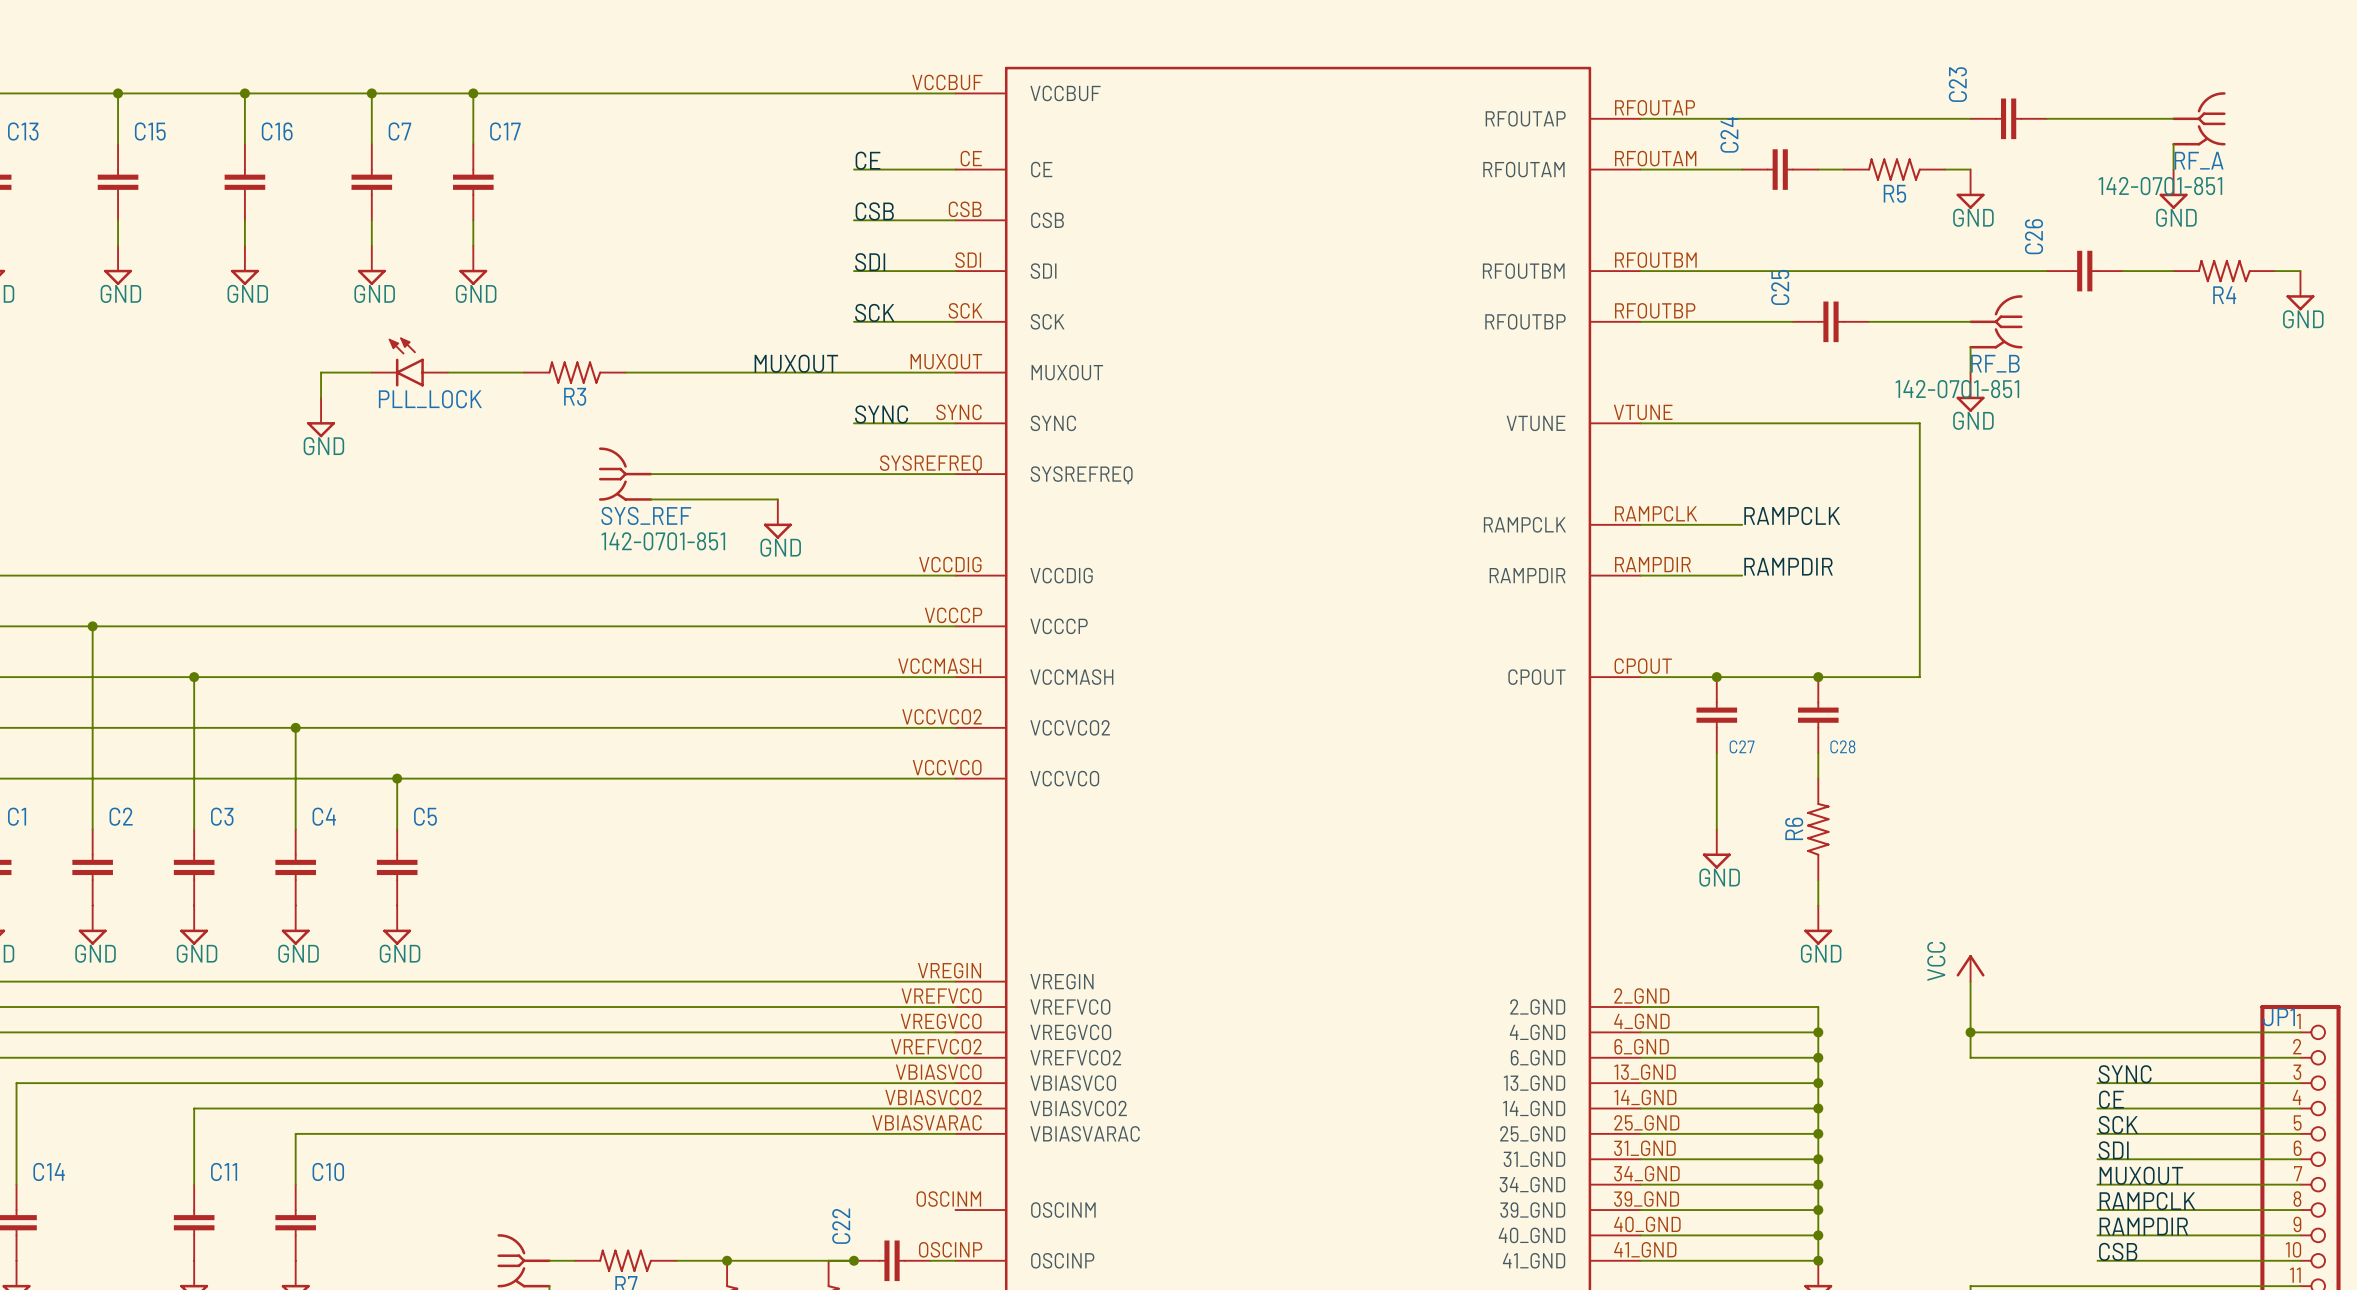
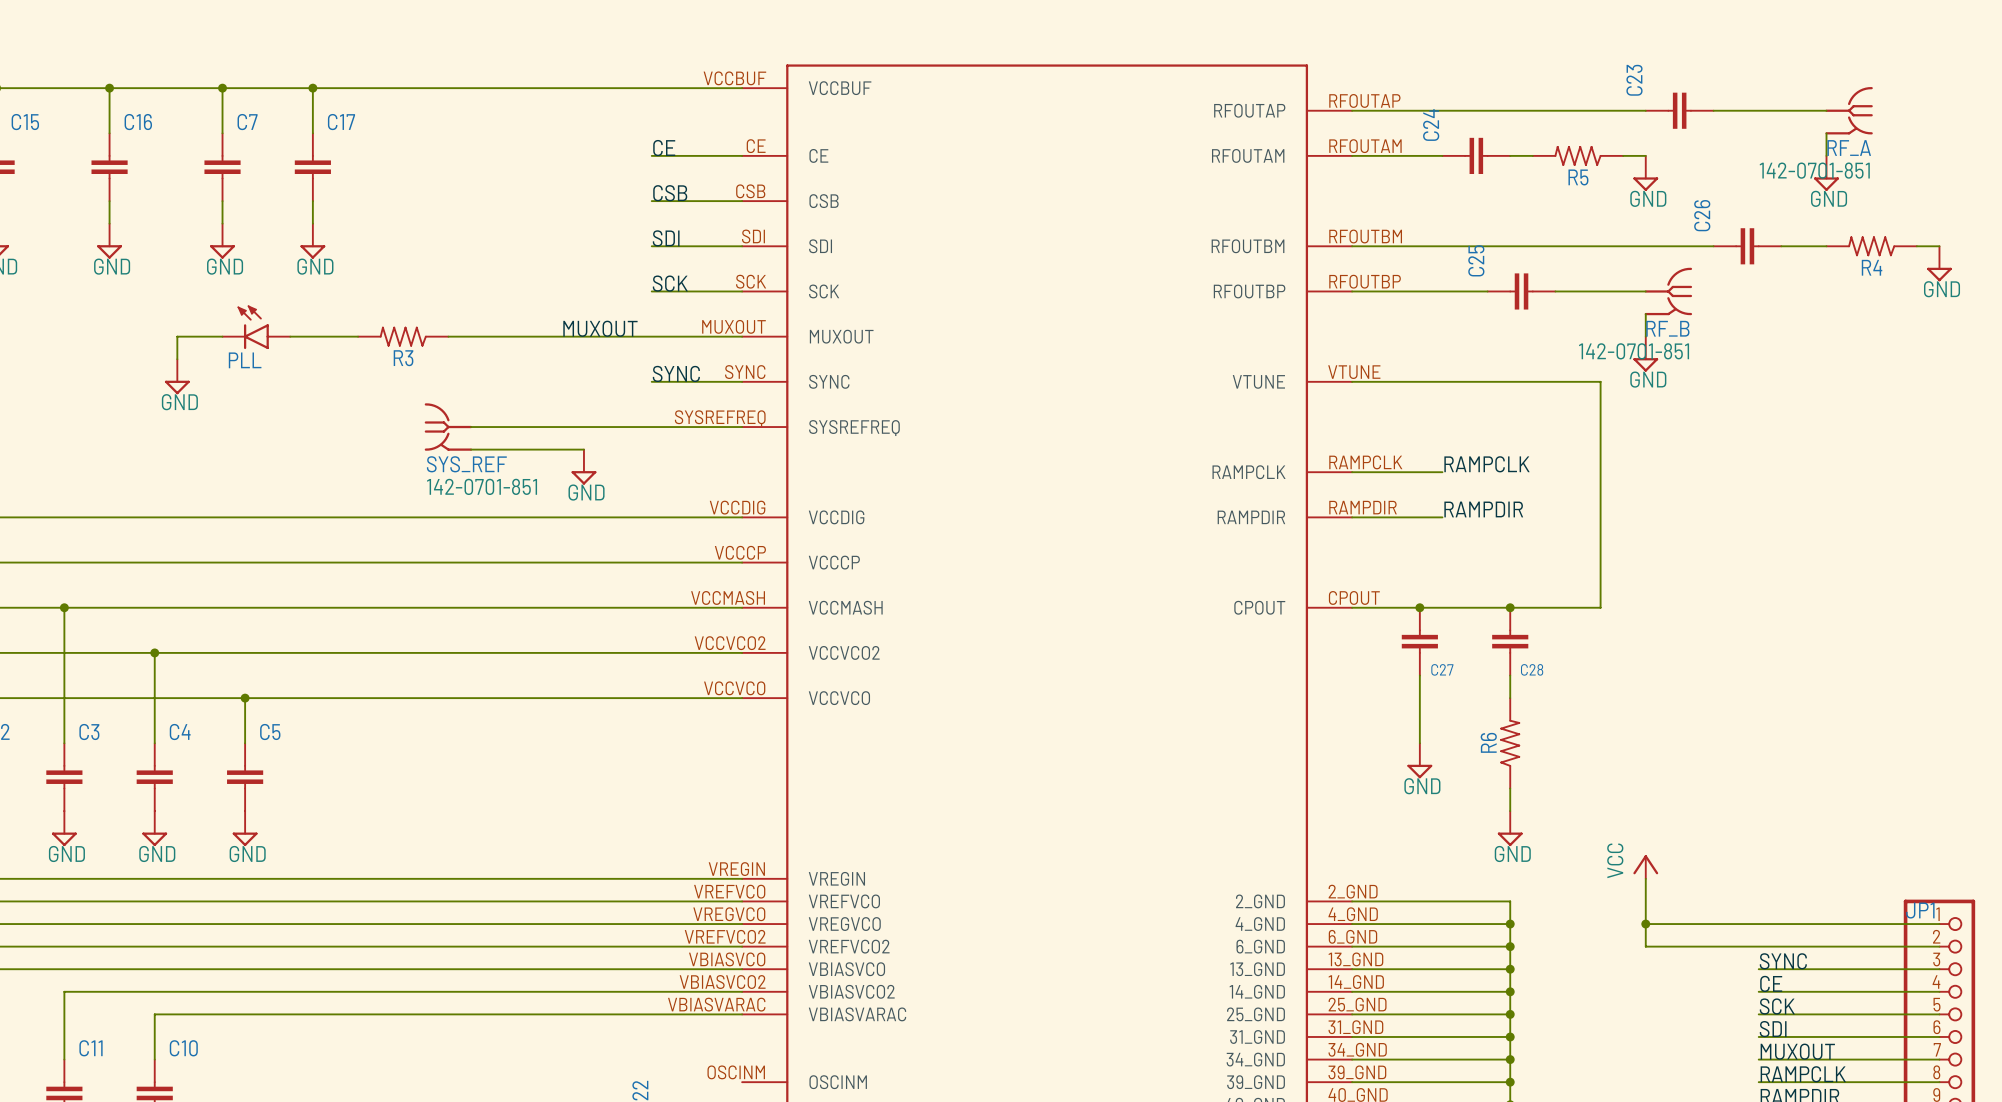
PLL_LOCK name: PLL_LOCK (430, 399) -> PLL (245, 360)

